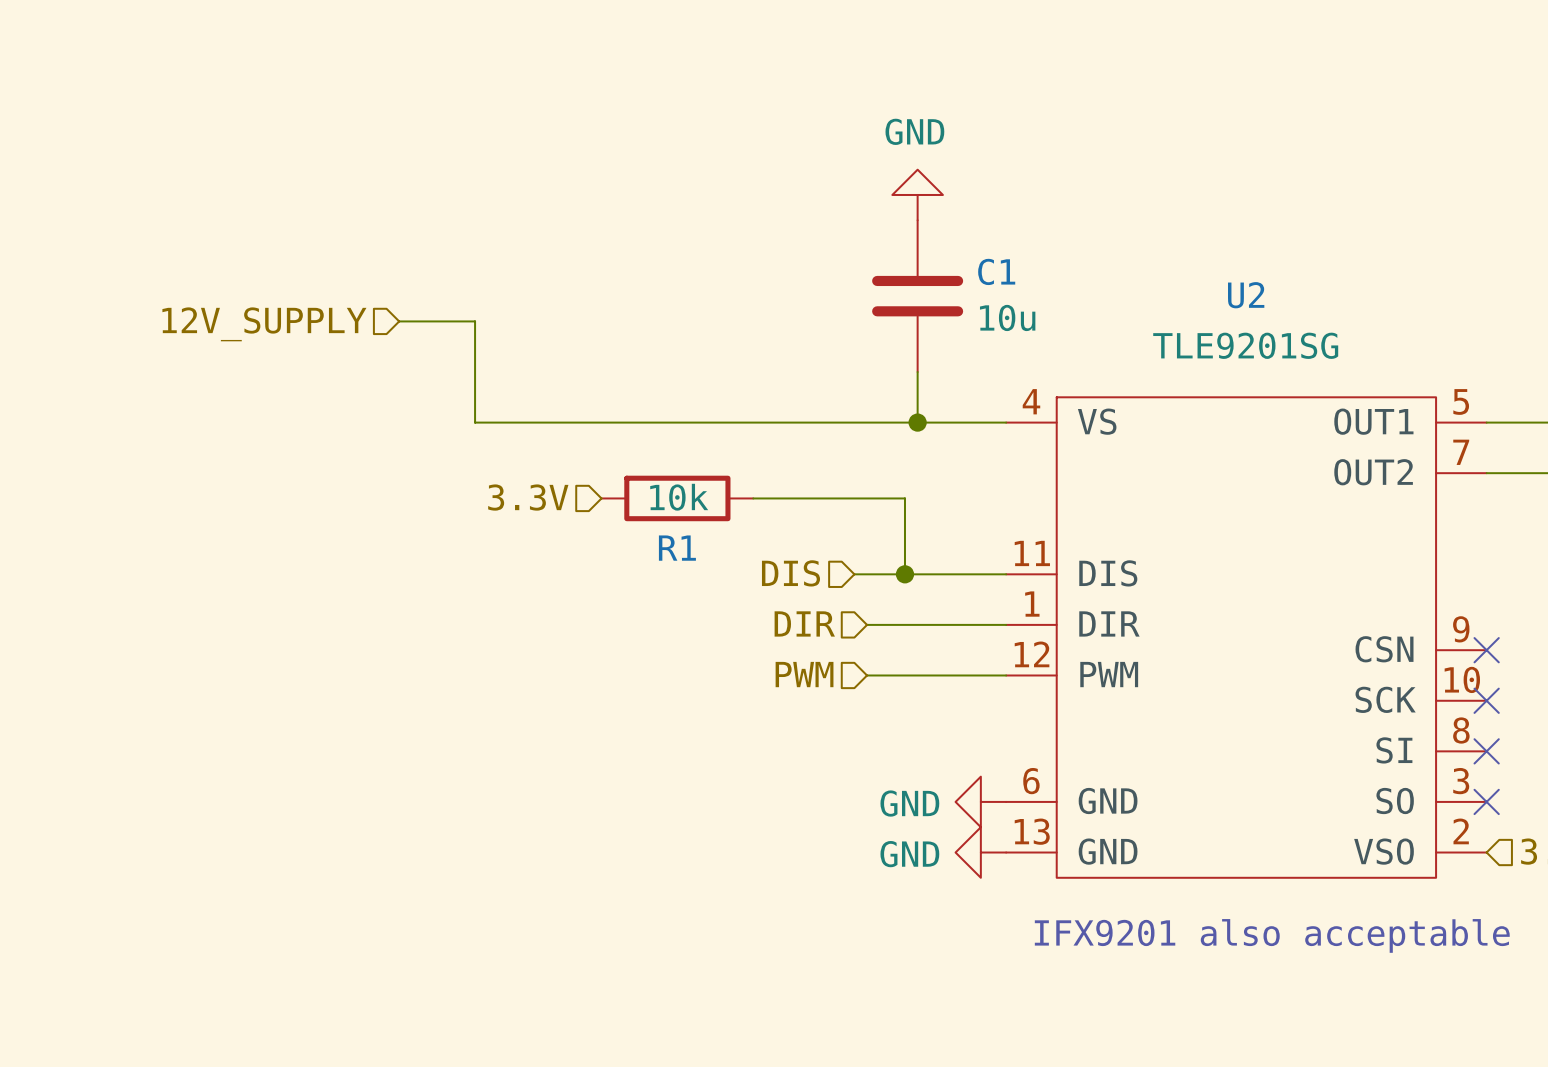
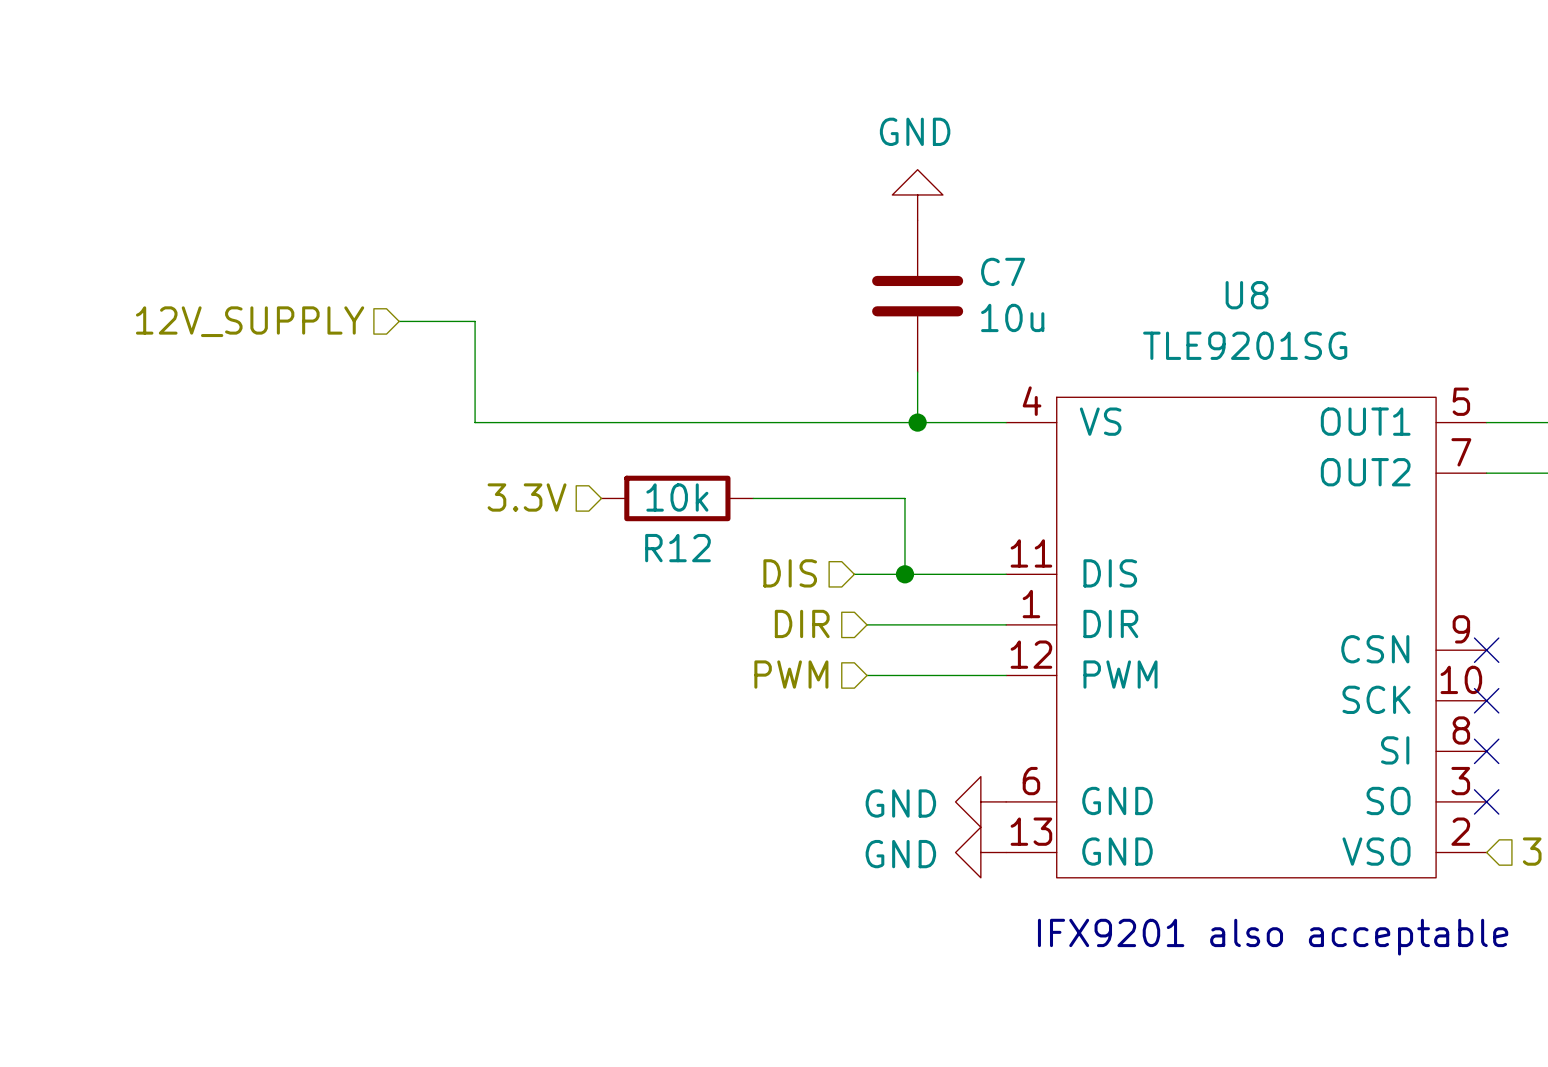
C1 name: C1 (996, 271) -> C7 (1003, 271)
U2 name: U2 (1246, 295) -> U8 (1247, 295)
R1 name: R1 (677, 548) -> R12 (677, 548)

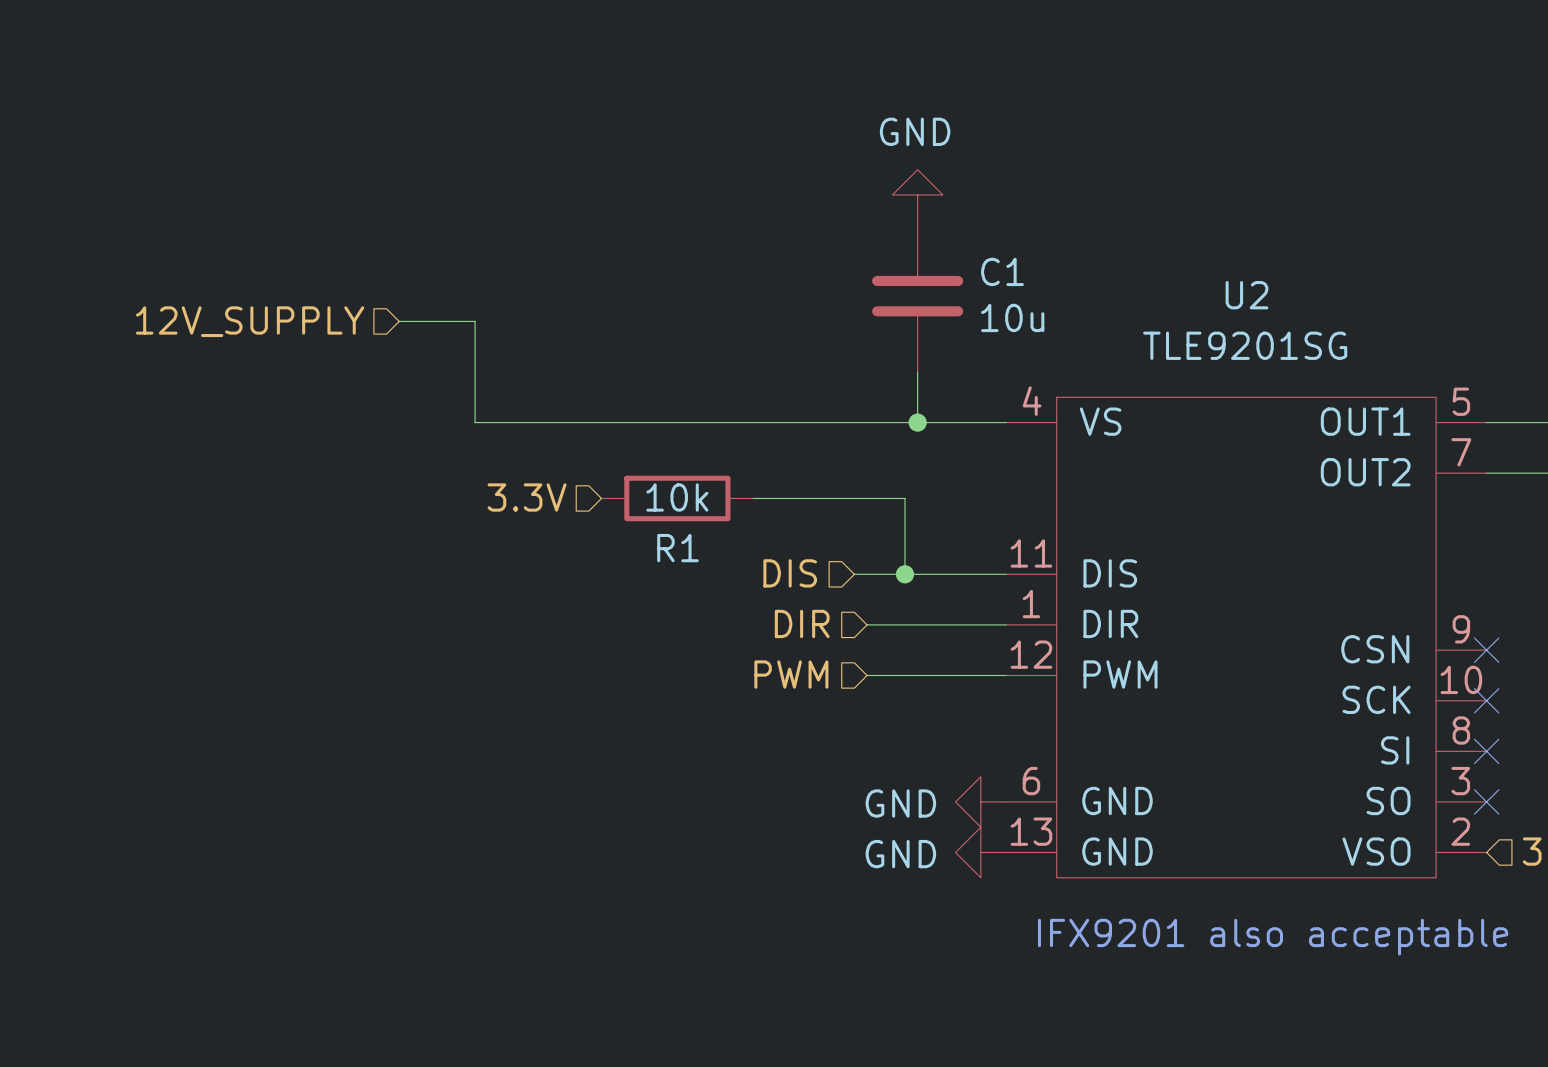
C7 name: C7 (1003, 271) -> C1 (1002, 271)
U8 name: U8 (1247, 295) -> U2 (1247, 295)
R12 name: R12 (677, 548) -> R1 (677, 548)

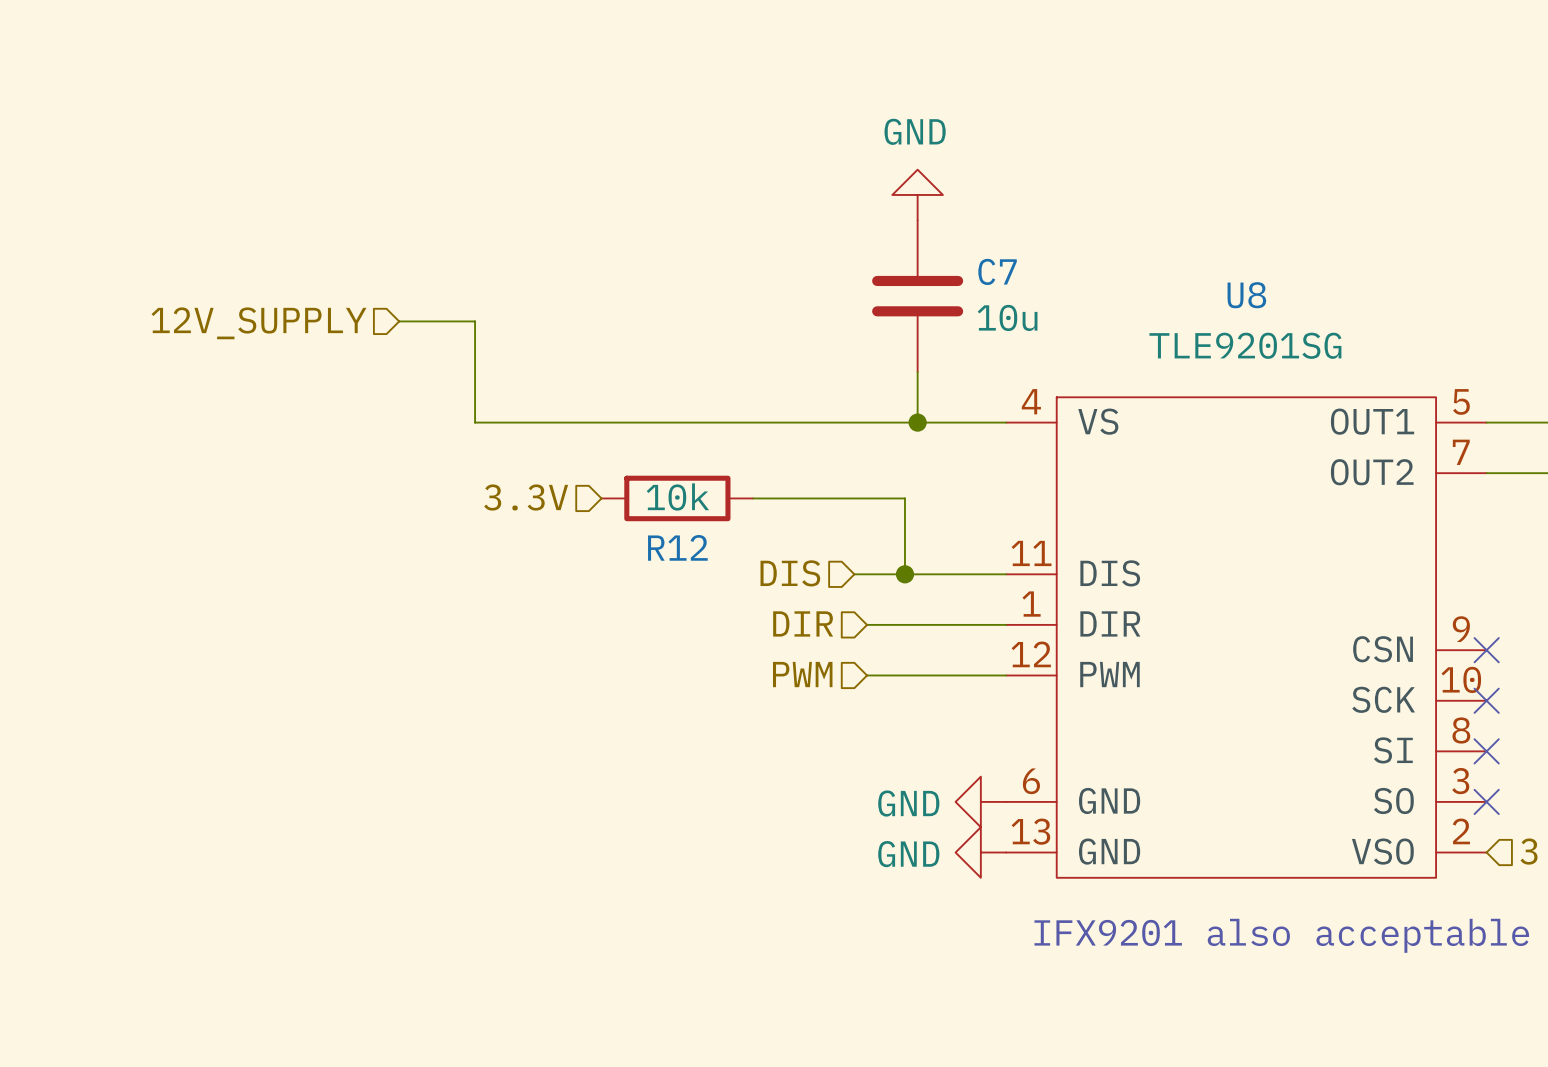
C1 name: C1 (1002, 271) -> C7 (997, 271)
U2 name: U2 (1247, 295) -> U8 (1246, 295)
R1 name: R1 (677, 548) -> R12 (677, 547)

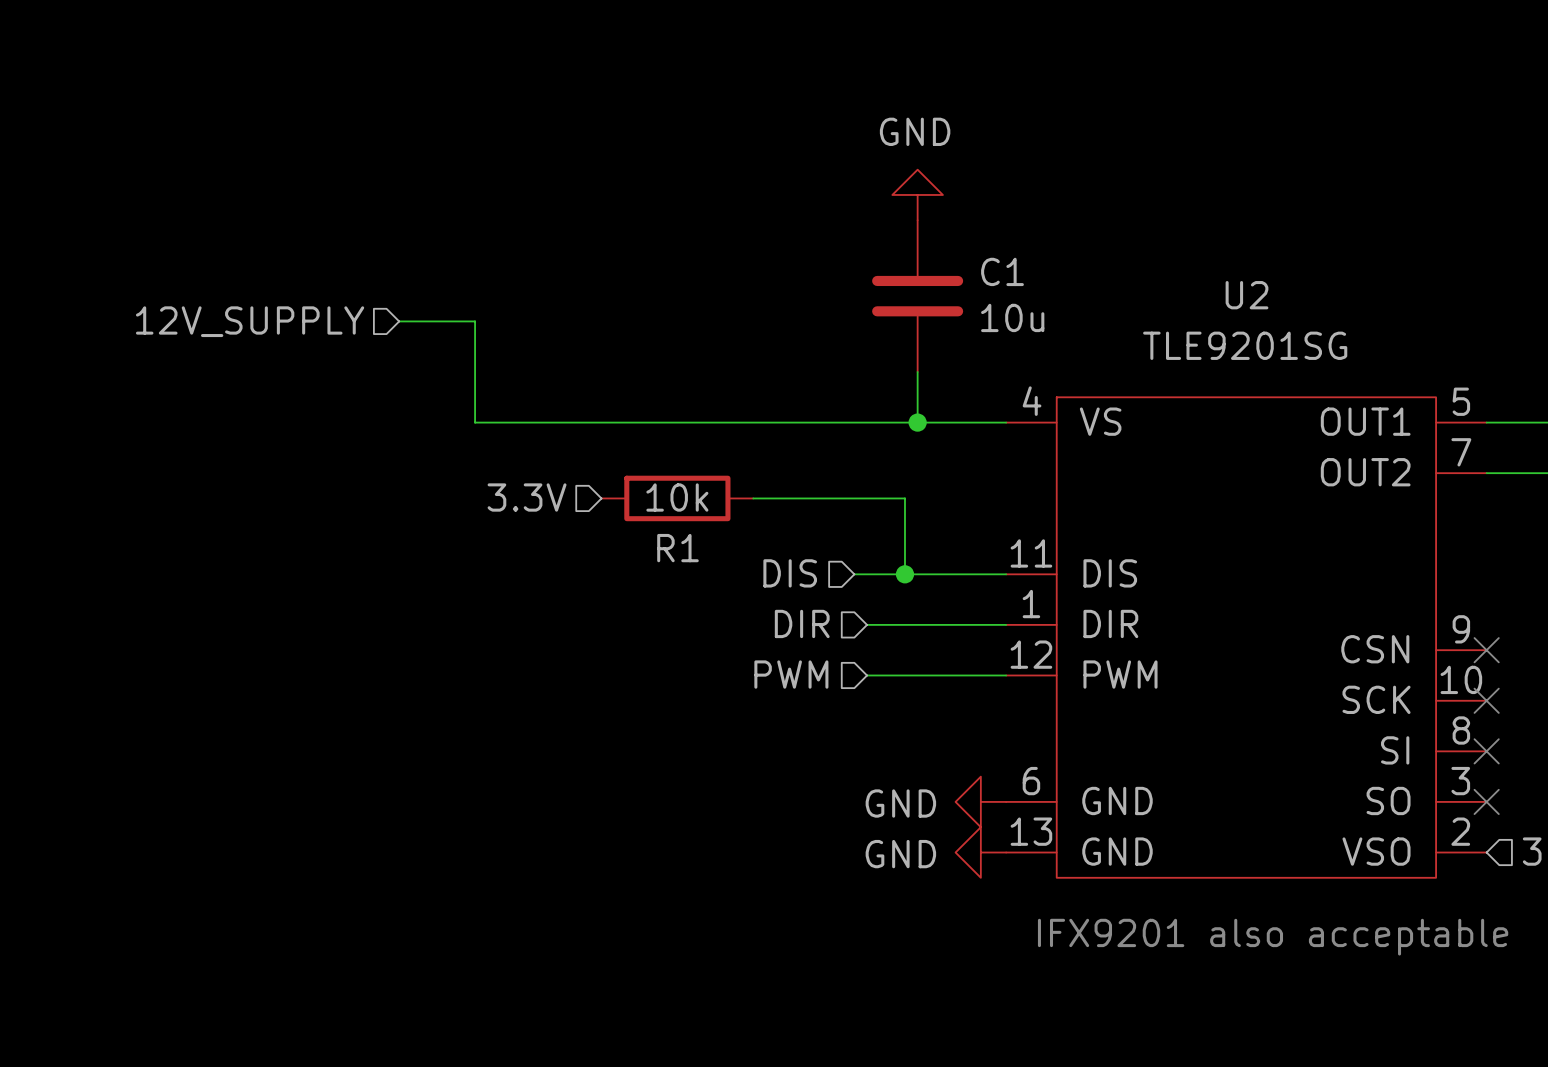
C7 name: C7 (997, 271) -> C1 (1002, 271)
U8 name: U8 (1246, 295) -> U2 (1247, 295)
R12 name: R12 (677, 547) -> R1 (677, 548)

